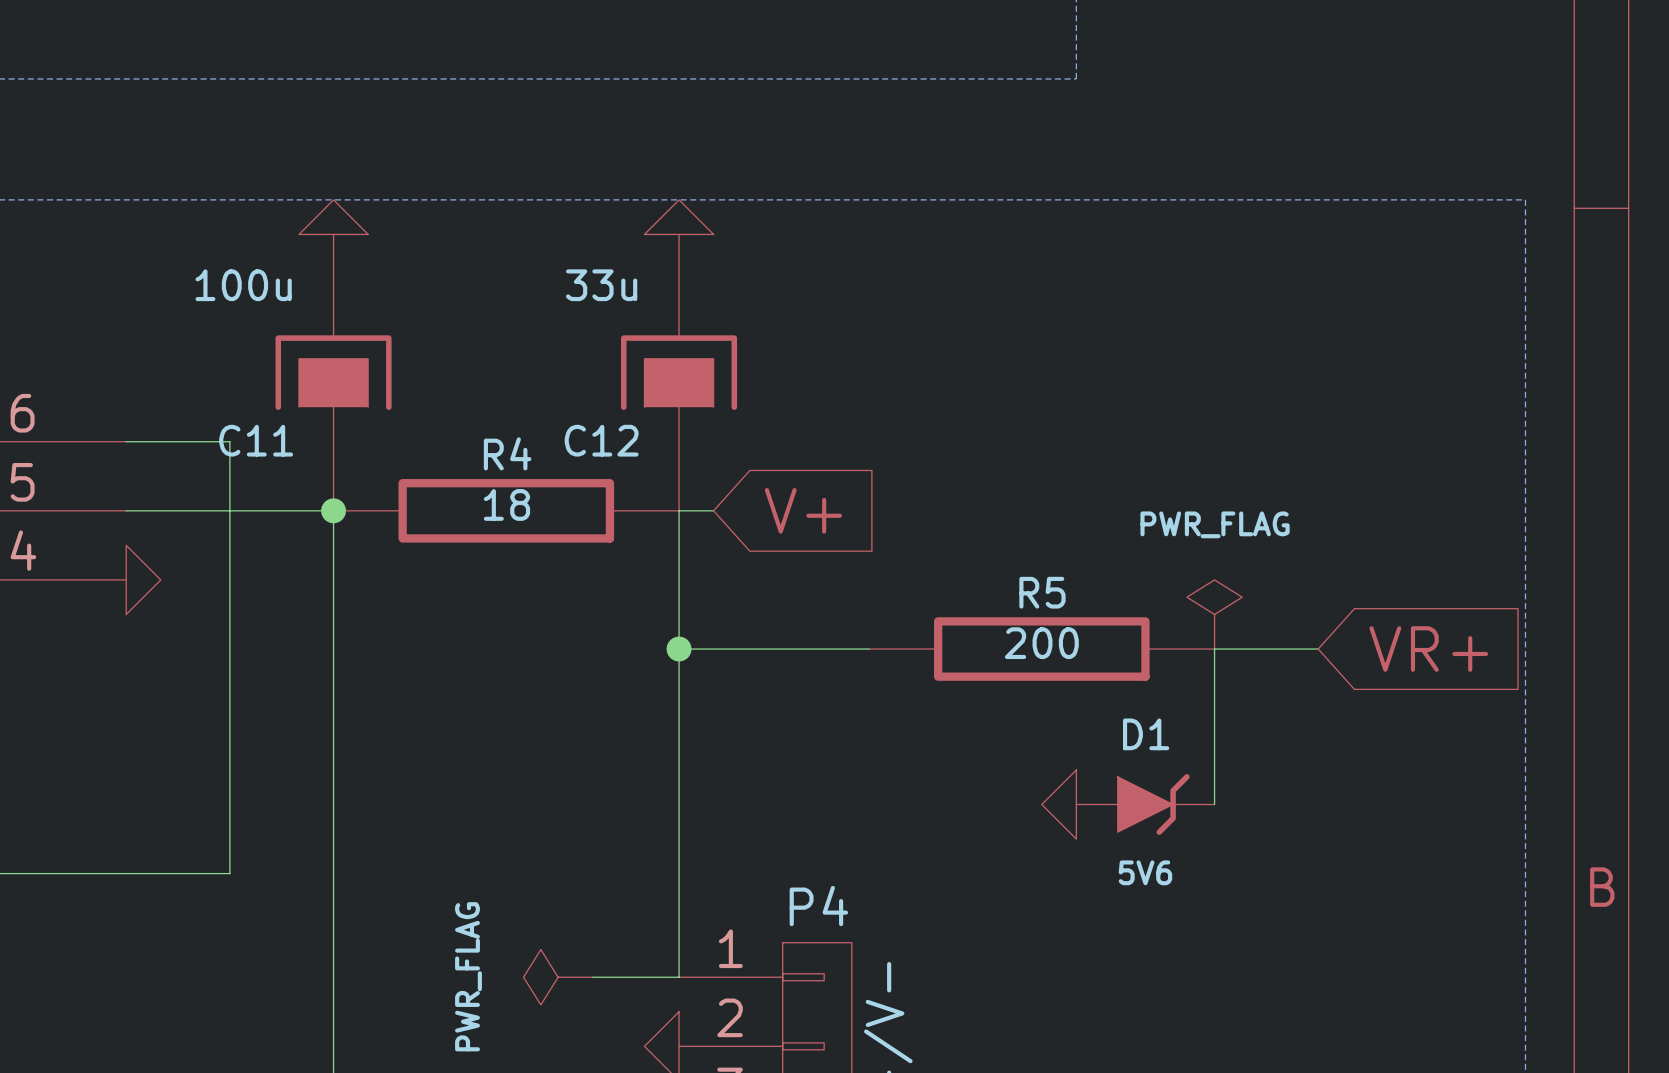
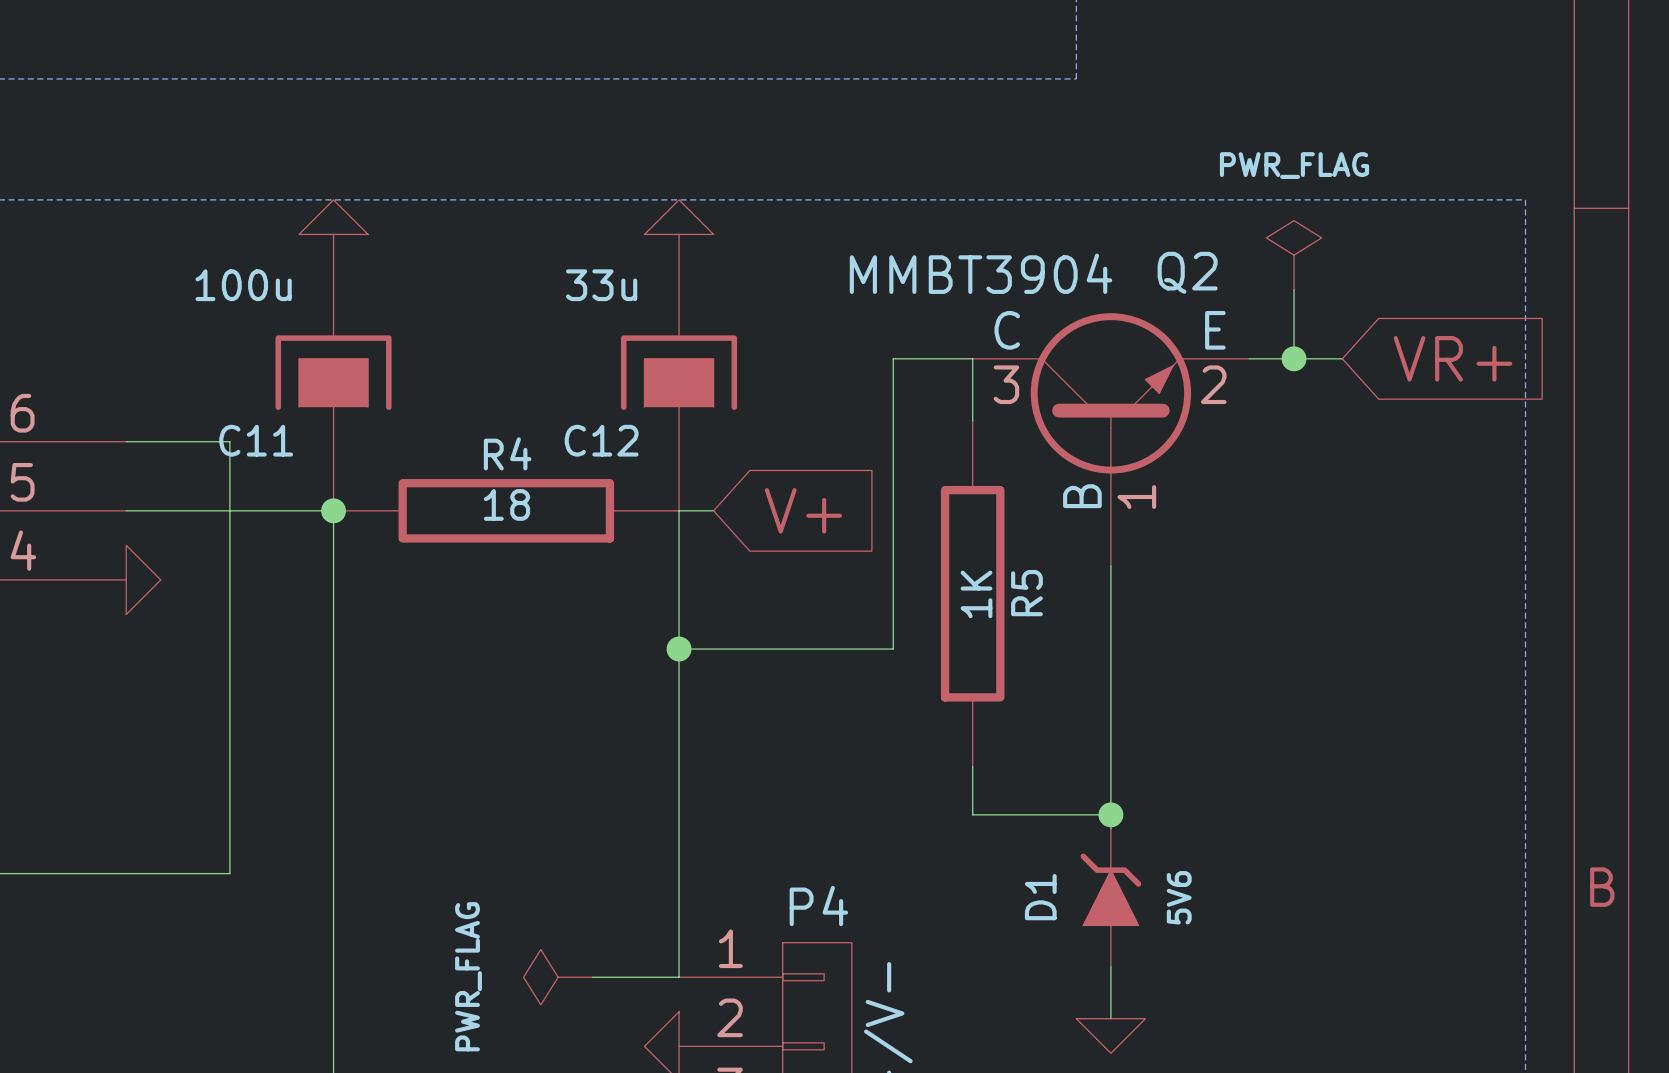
wire: none -> (1294, 289) (1294, 358)
wire: none -> (1249, 358) (1342, 358)
junction: none -> (1294, 358)
wire: none -> (972, 421) (972, 358) (893, 358) (893, 649) (869, 649)
Q2: none -> MMBT3904 (1110, 439)
wire: none -> (1110, 566) (1110, 828)
power symbol position: PWR_FLAG (1214, 614) -> PWR_FLAG (1294, 255)
R5 value: 200 (1041, 643) -> 1K (976, 594)
R5 rotation: 0° (1041, 649) -> 90° clockwise (972, 593)
wire: (1318, 649) (1214, 649) (1214, 804) -> none
global label position: VR+ (1428, 649) -> VR+ (1452, 358)
wire: none -> (972, 766) (972, 814) (1110, 814)
power symbol: (1059, 804) -> none
D1 position: (1145, 804) -> (1110, 897)
D1 rotation: 0° (1153, 804) -> 90° counterclockwise (1110, 889)
junction: none -> (1110, 814)
wire: none -> (1110, 966) (1110, 1018)
power symbol: none -> (1110, 1035)

